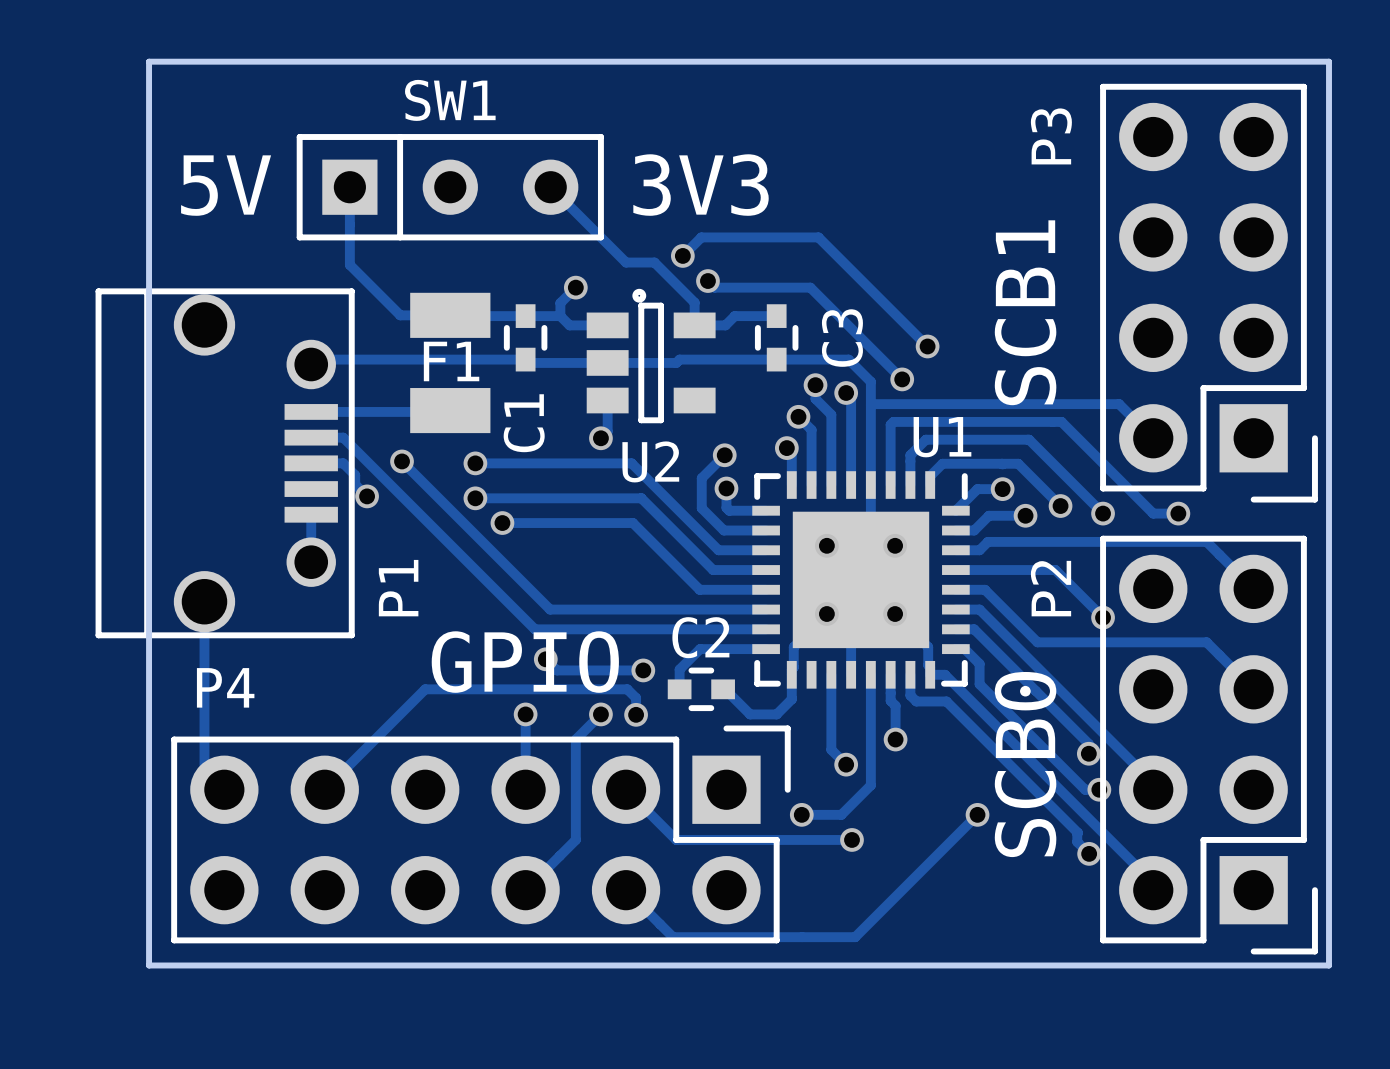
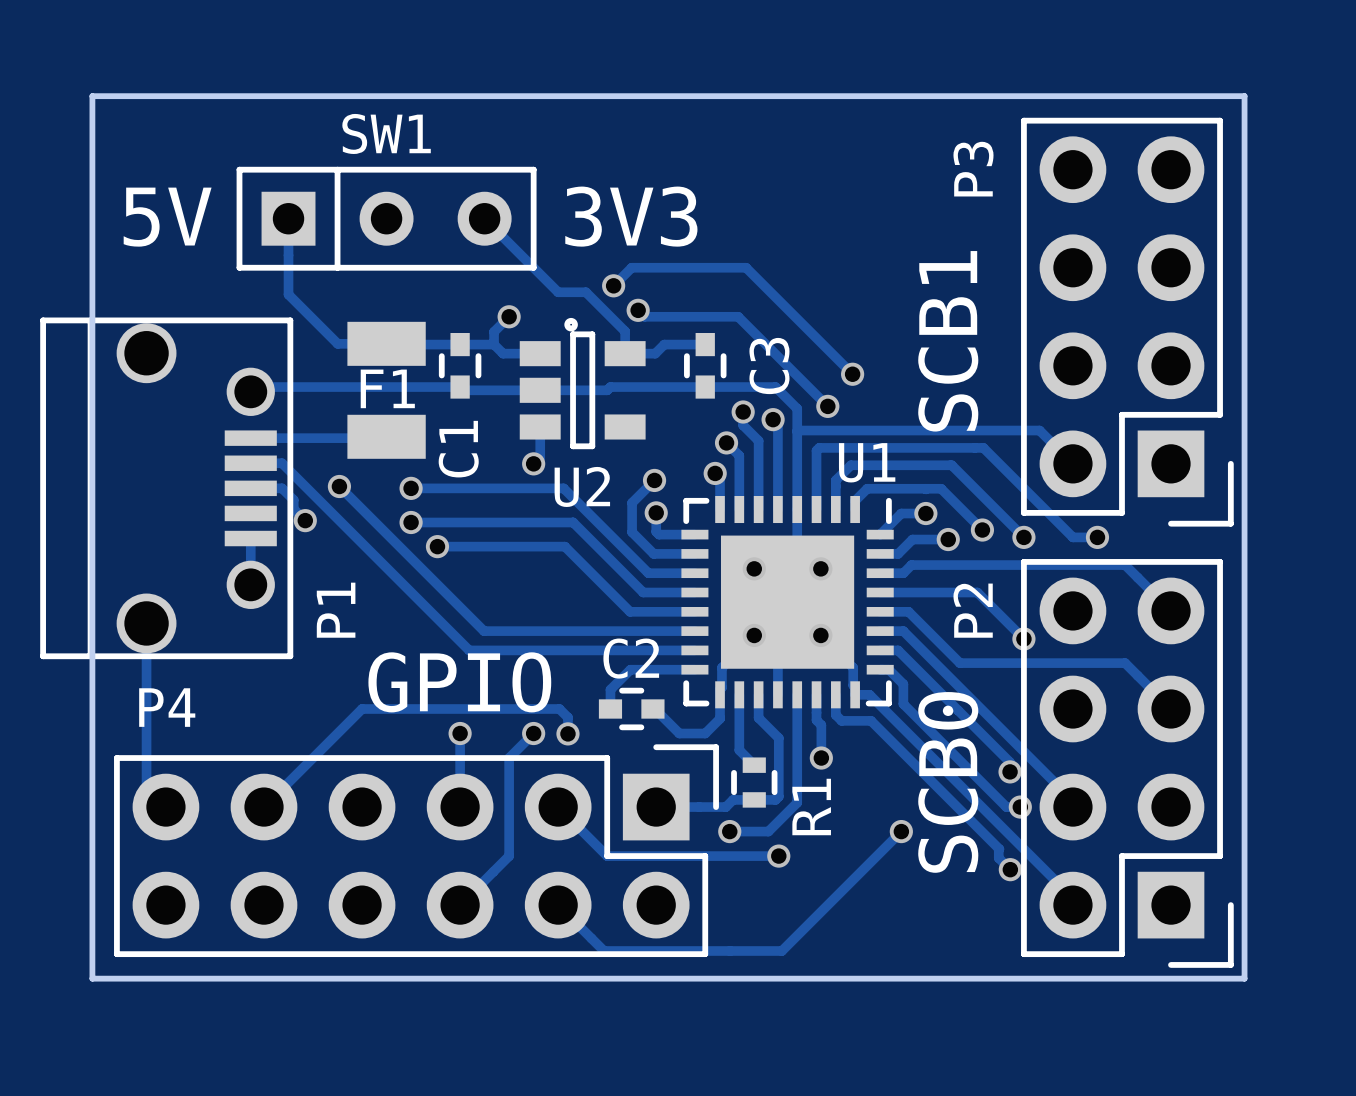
track: (545, 659) (556, 670) (643, 670) -> none
via: (545, 659) -> none
via: (643, 670) -> none
track: none -> (739, 694) (739, 750) (754, 765)
track: (831, 698) (831, 749) (846, 764) -> (758, 717) (778, 738) (778, 796) (775, 799) (733, 799) (725, 807) (656, 807)
R1: none -> (754, 782)
via: (846, 764) -> none

